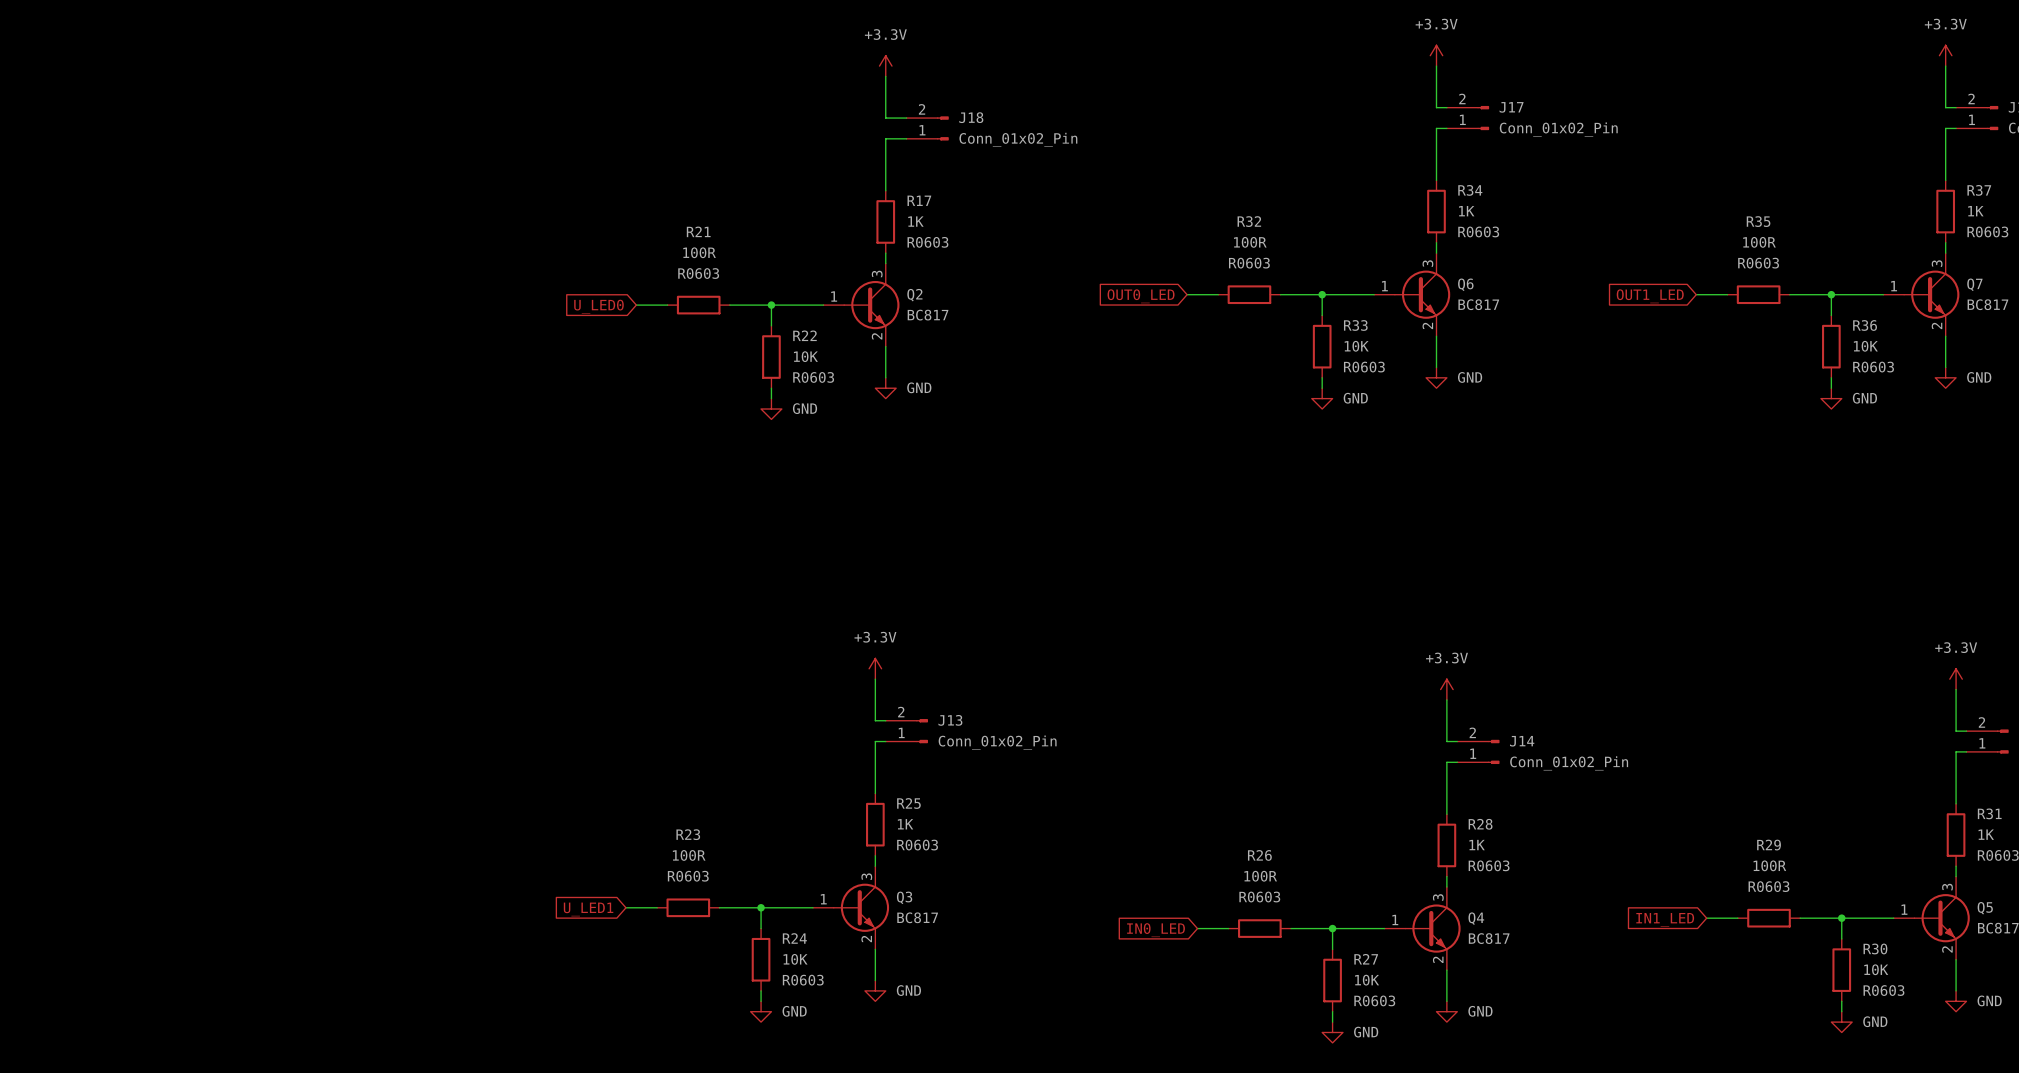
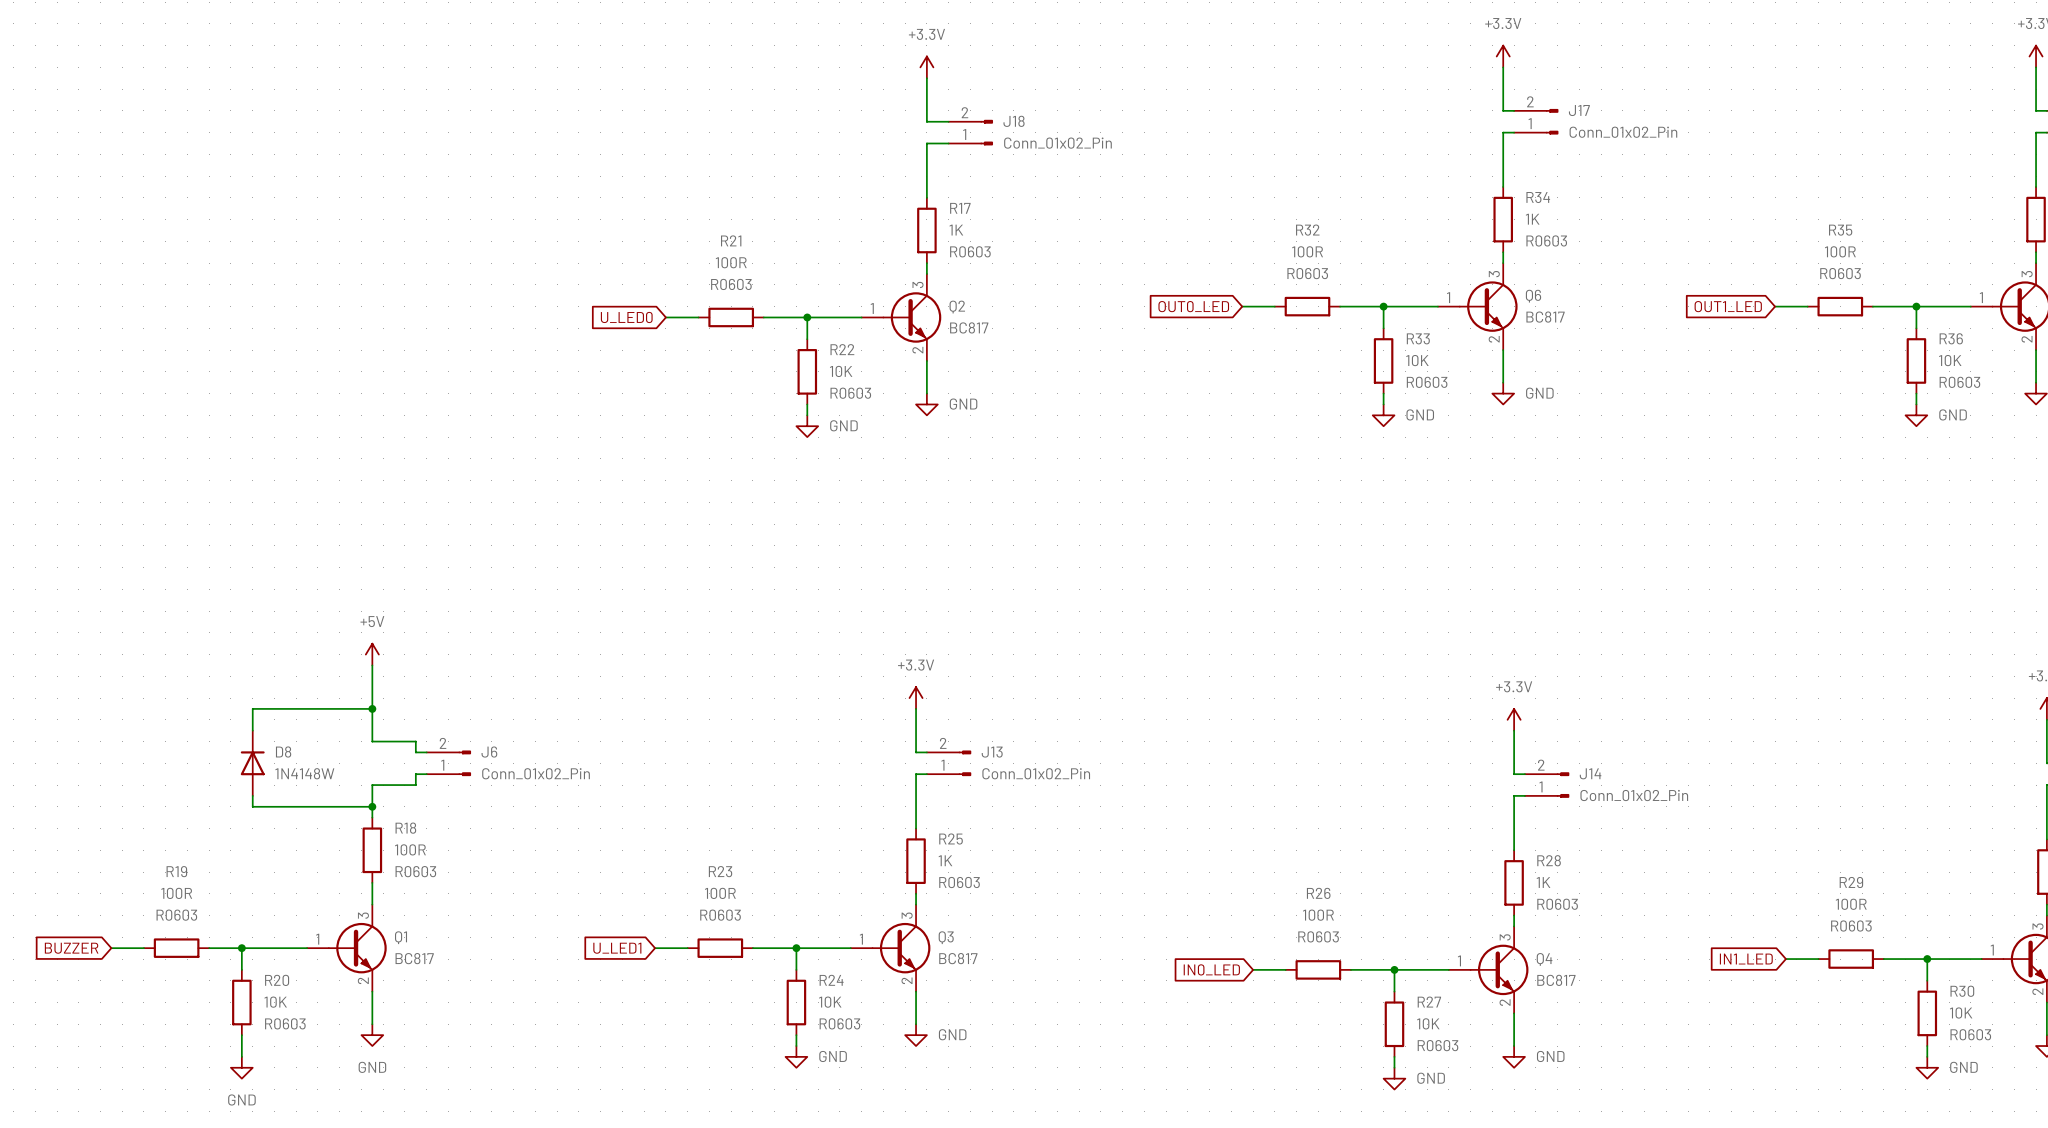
power symbol: none -> +5V (372, 654)
wire: none -> (372, 665) (372, 741) (415, 741) (415, 752) (426, 752)
wire: none -> (372, 708) (252, 708) (252, 730)
junction: none -> (372, 708)
D8: none -> 1N4148W (252, 763)
J6: none -> Conn_01x02_Pin (448, 763)
wire: none -> (426, 774) (415, 774) (415, 785) (372, 785) (372, 817)
wire: none -> (252, 795) (252, 806) (372, 806)
junction: none -> (372, 806)
R18: none -> 100R (372, 850)
wire: none -> (372, 882) (372, 904)
global label: none -> BUZZER (71, 948)
wire: none -> (111, 948) (143, 948)
R19: none -> 100R (176, 948)
wire: none -> (209, 948) (307, 948)
wire: none -> (241, 948) (241, 969)
junction: none -> (241, 948)
Q1: none -> BC817 (346, 948)
wire: none -> (372, 991) (372, 1024)
R20: none -> 10K (241, 1002)
wire: none -> (241, 1035) (241, 1056)
power symbol: none -> GND (372, 1035)
power symbol: none -> GND (241, 1067)

